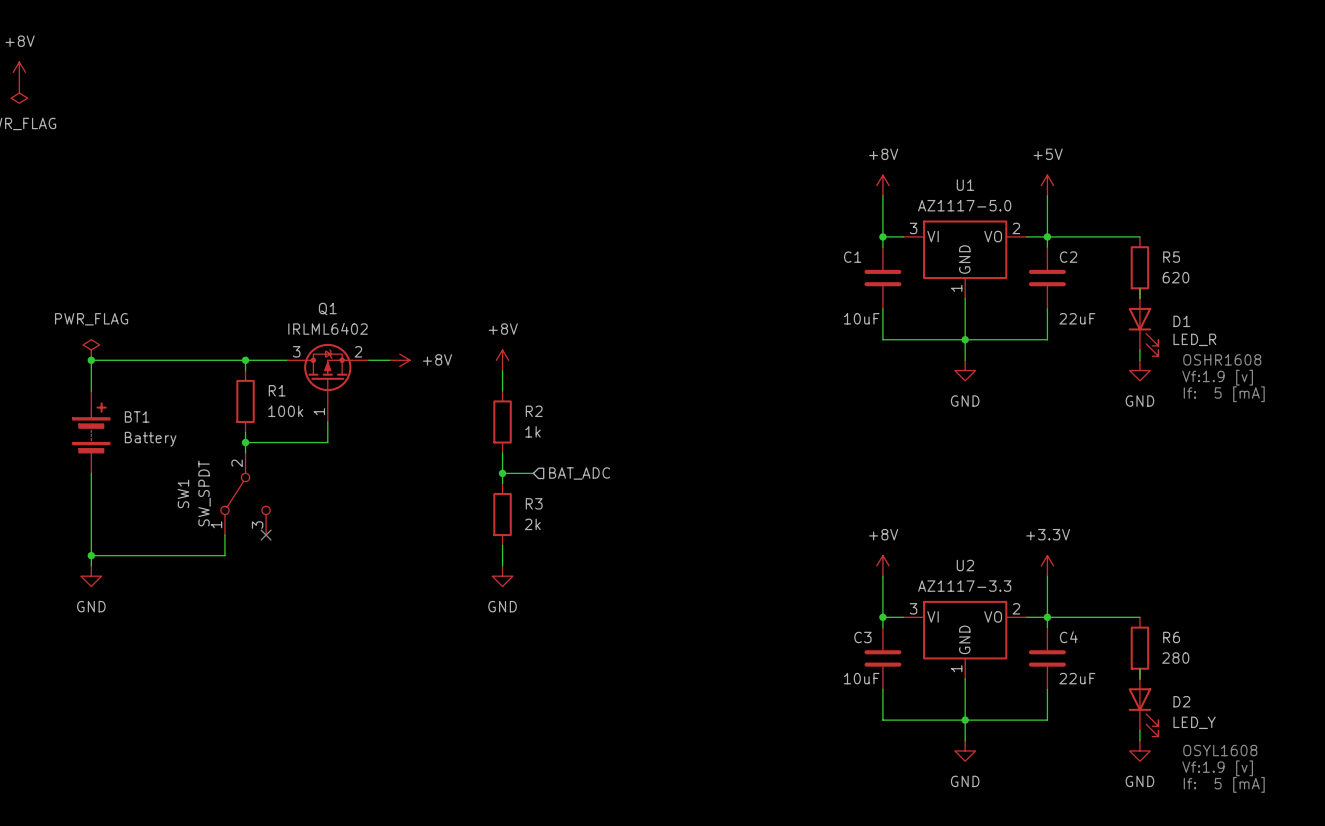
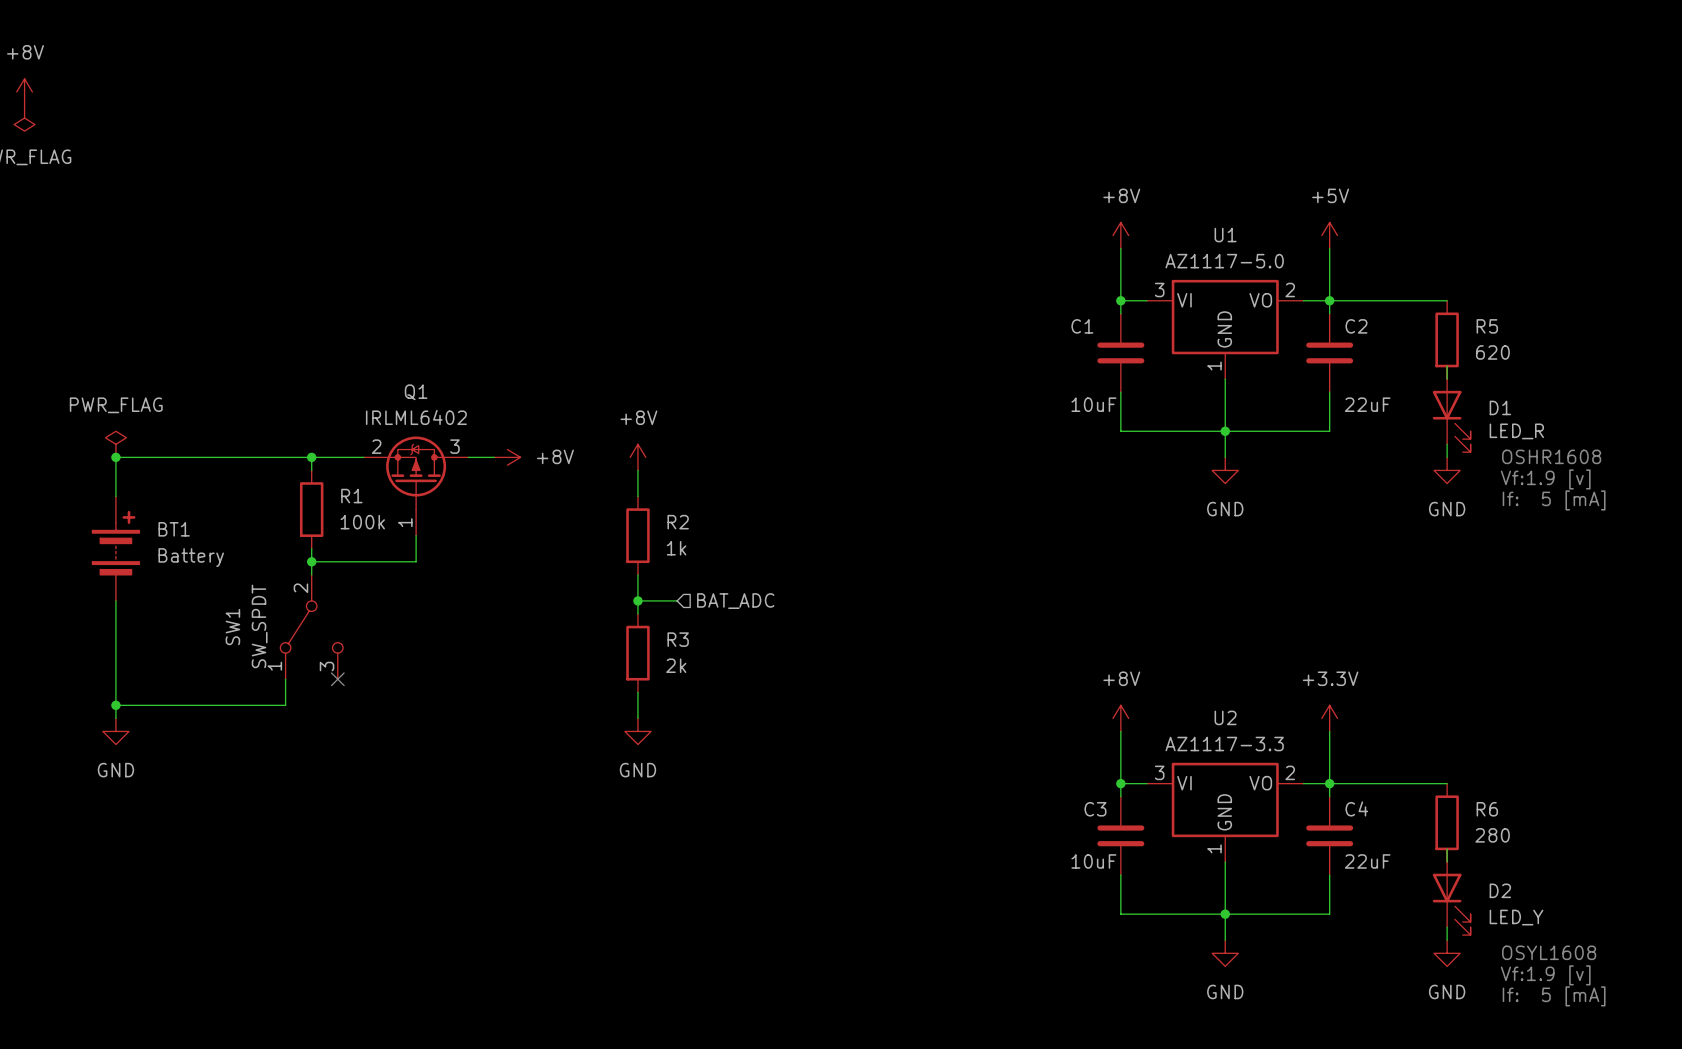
Q1 flip: as is (327, 372) -> left-right (416, 473)

